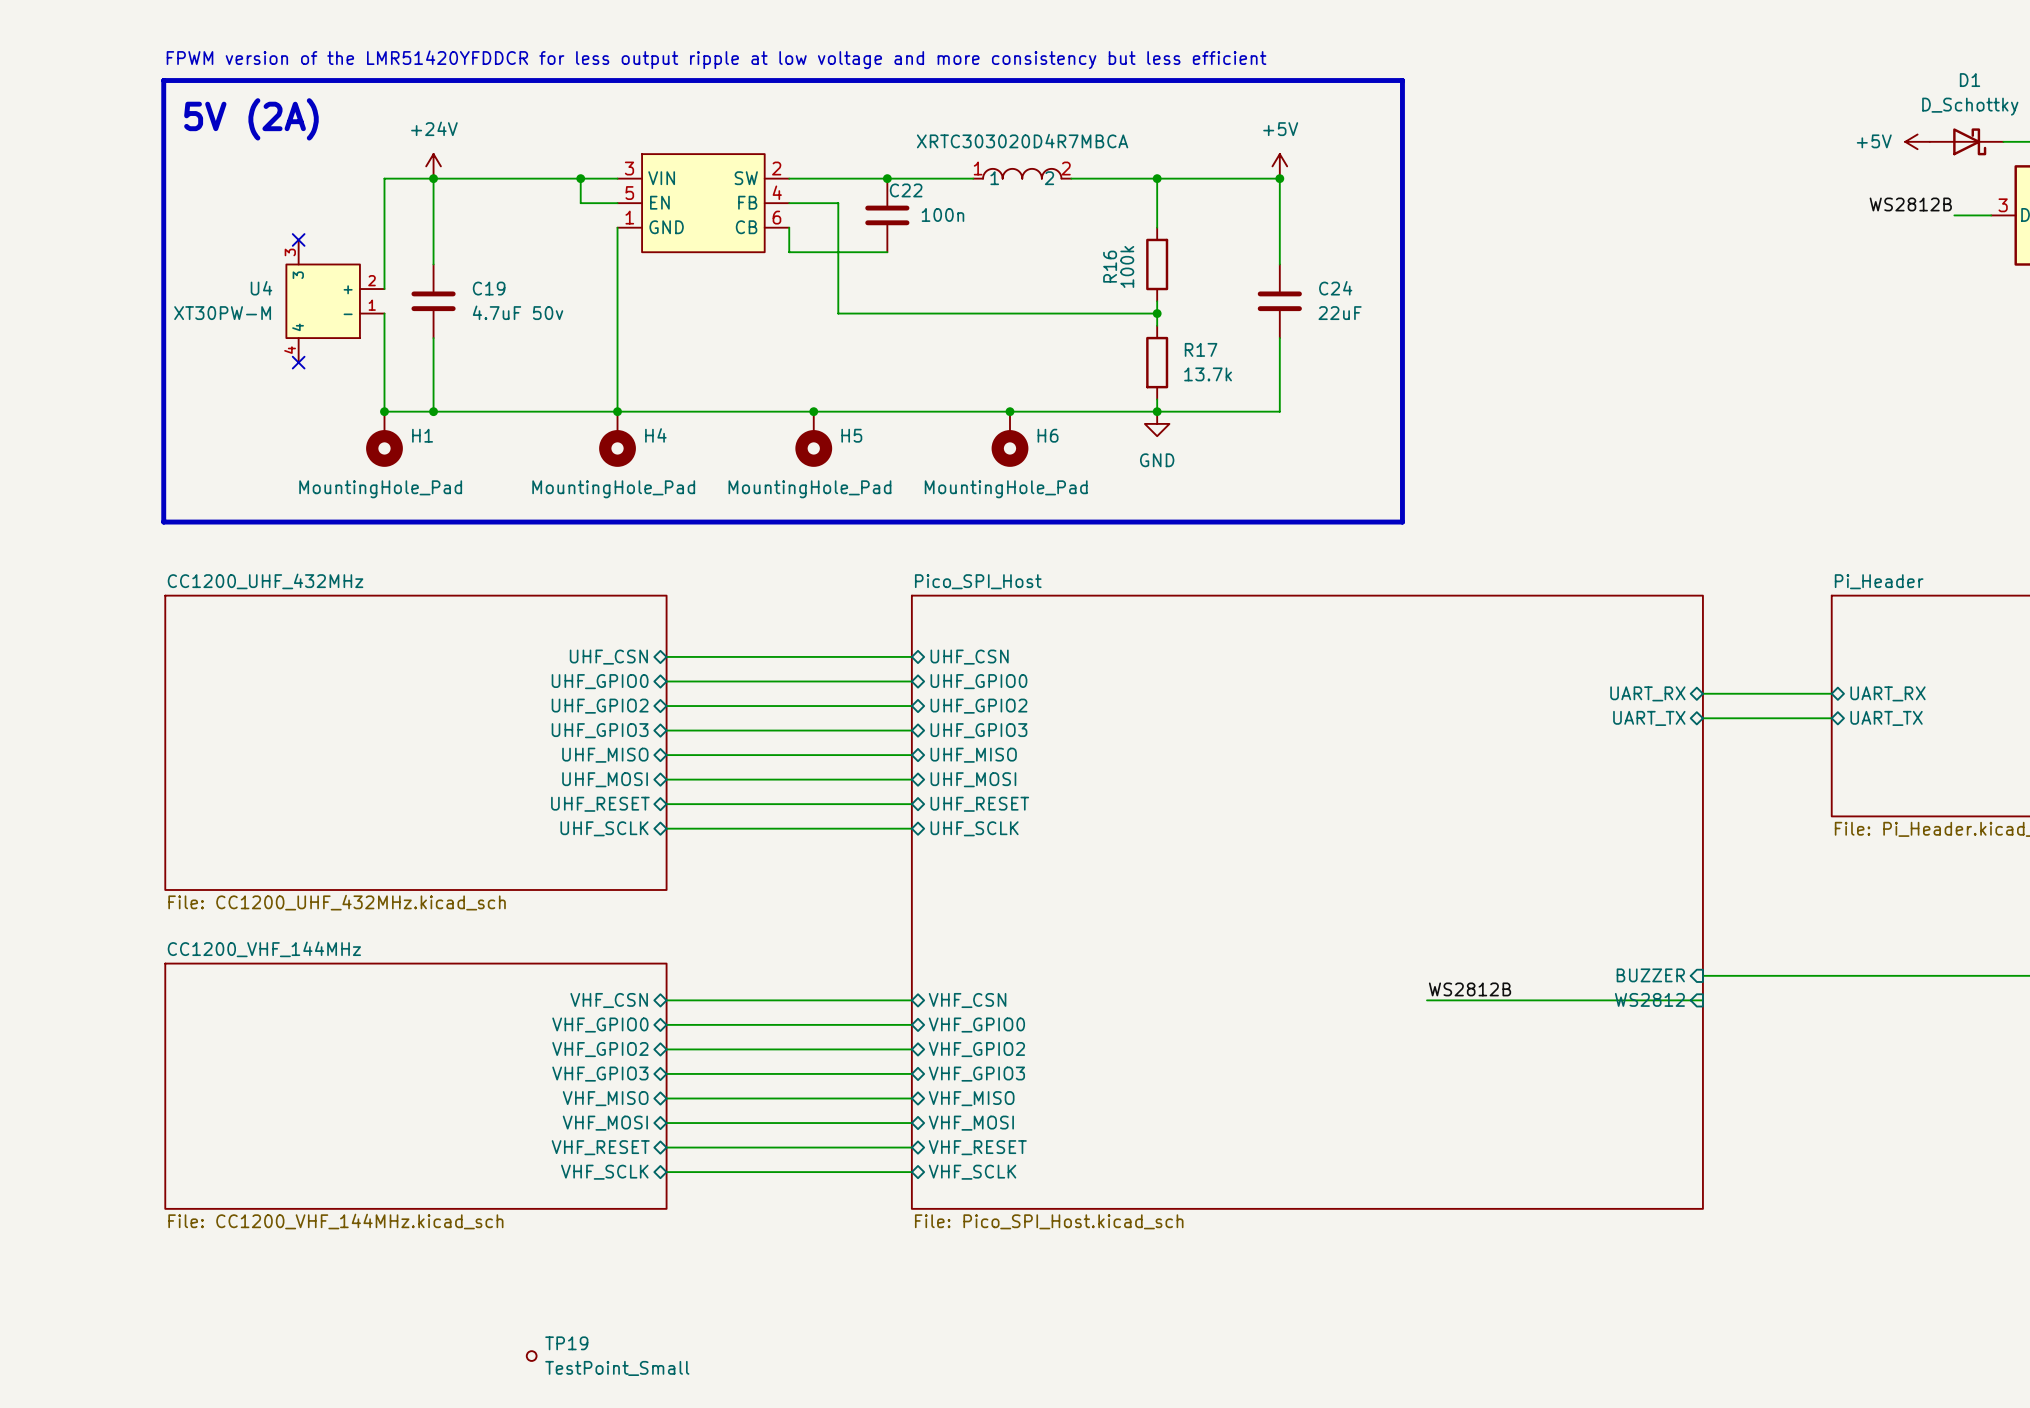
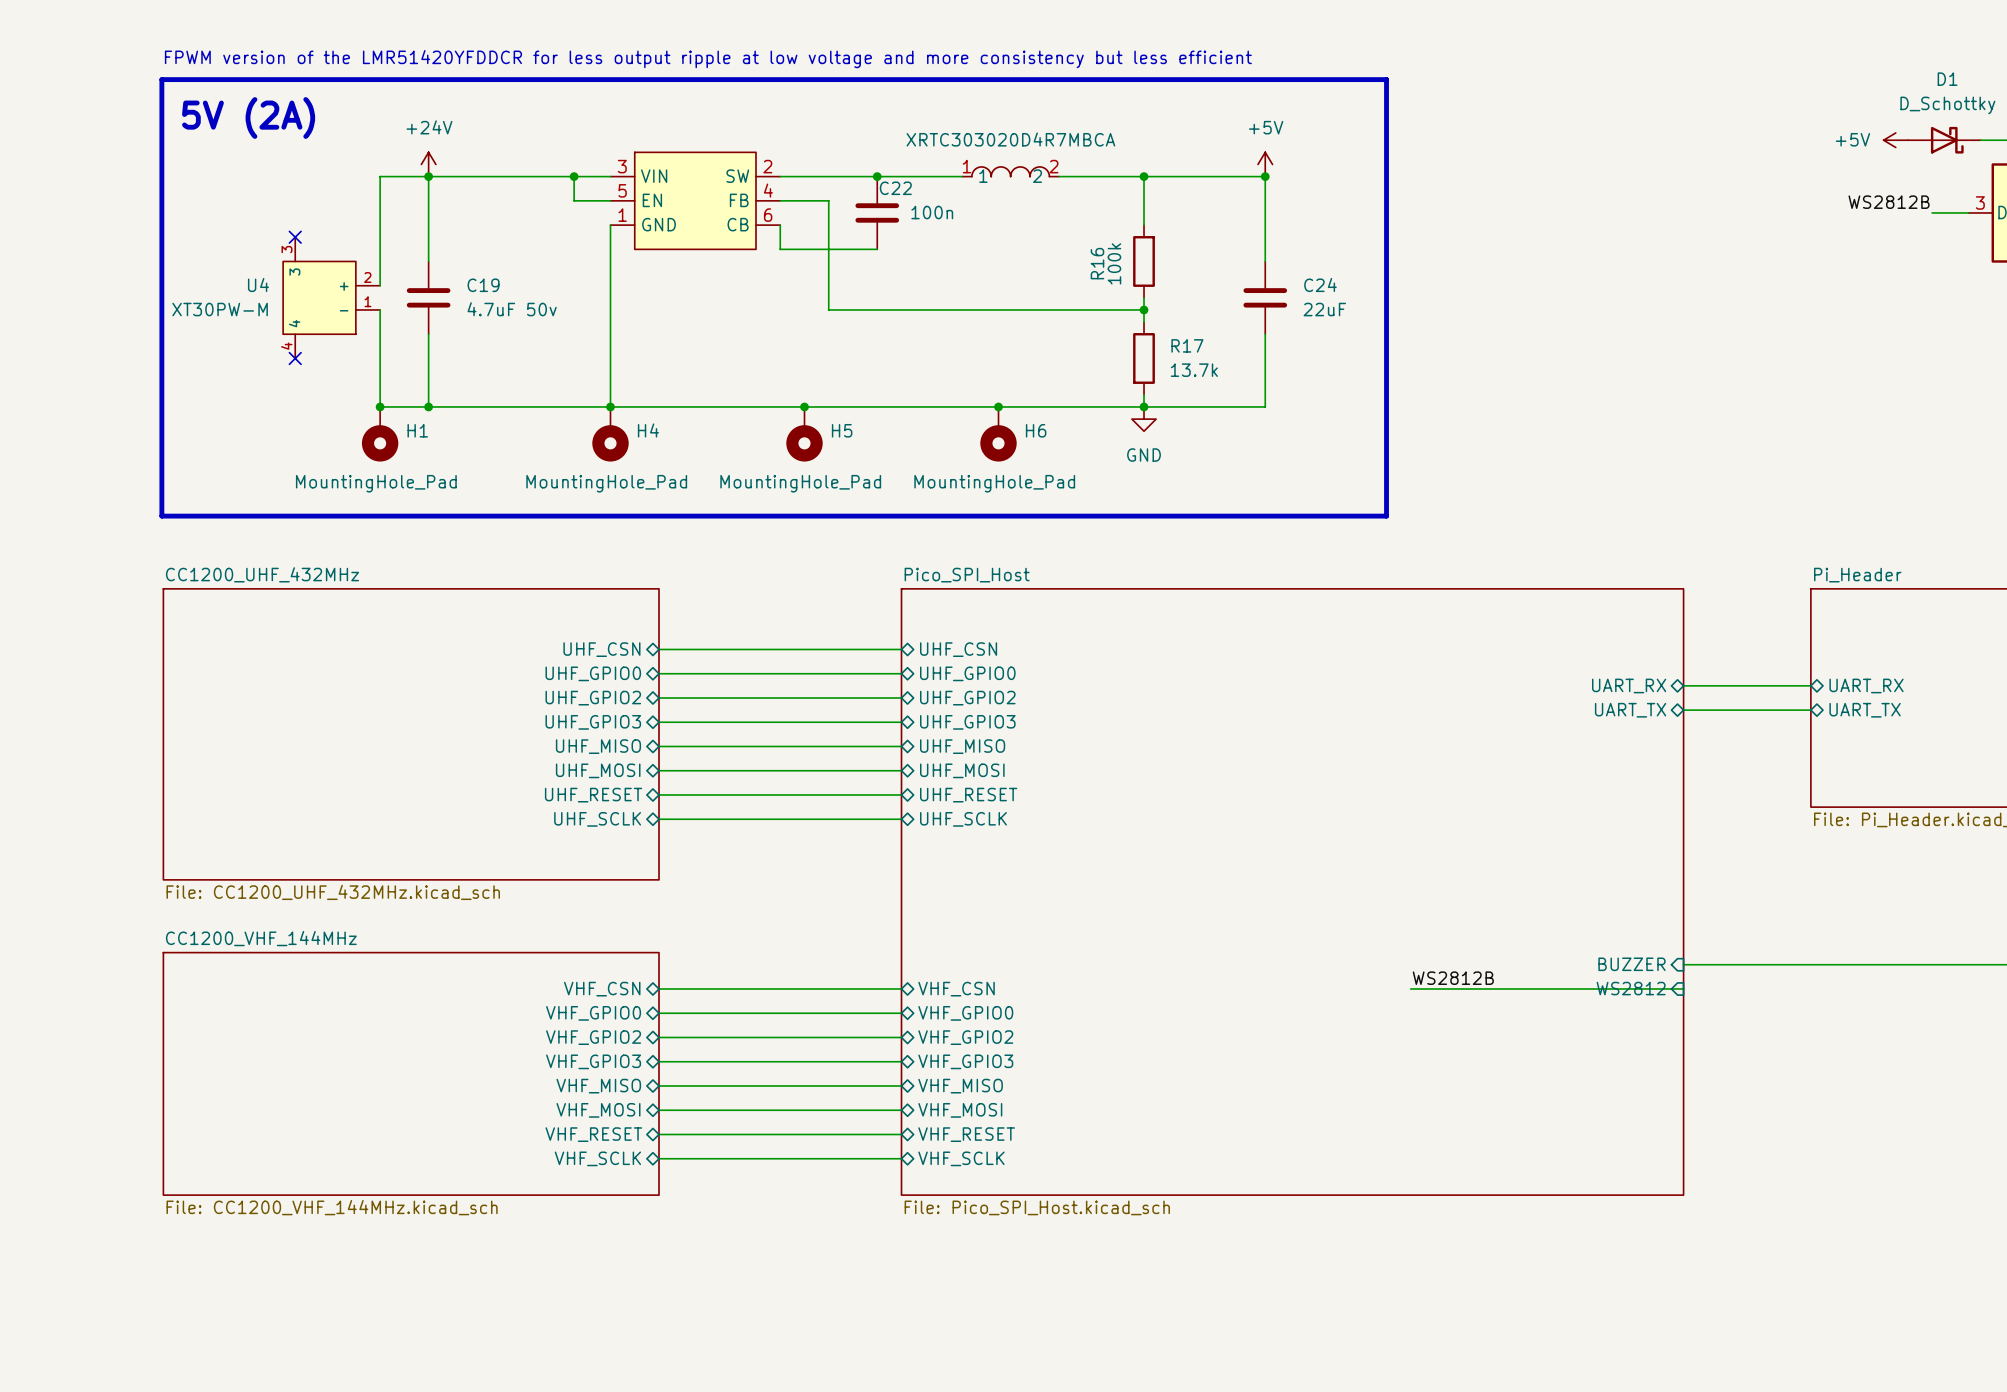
TP19: TestPoint_Small (531, 1356) -> none

